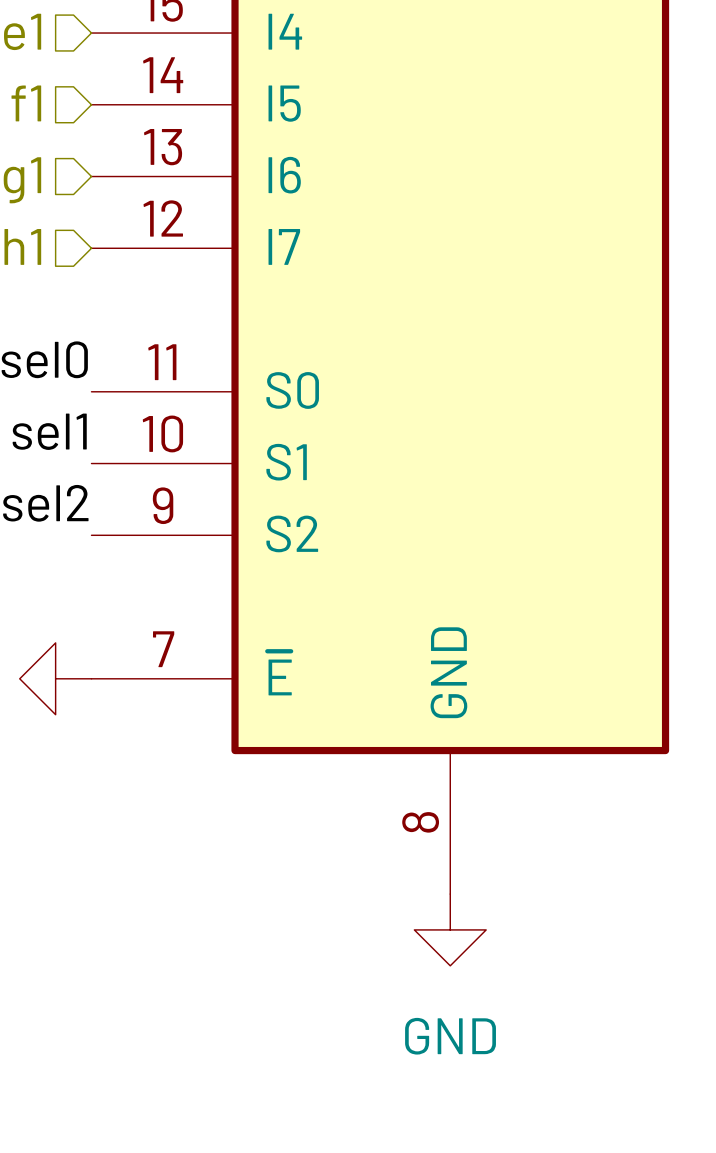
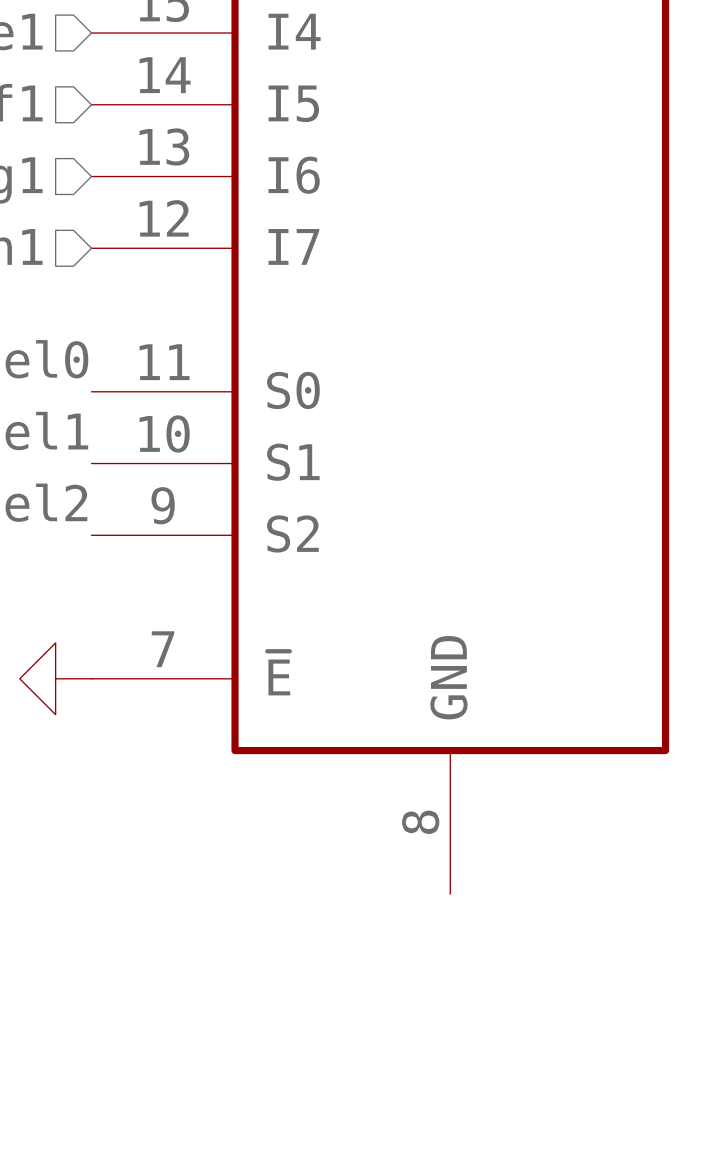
power symbol: GND (450, 929) -> none

